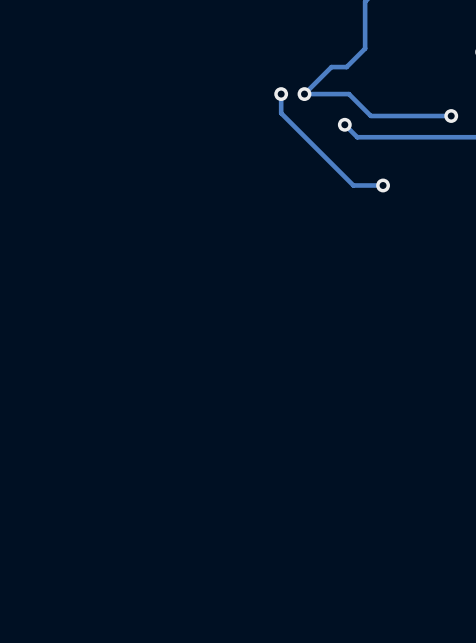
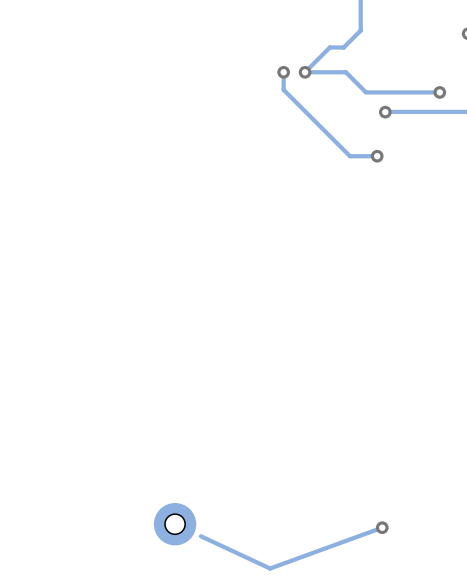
track: (344, 124) (357, 137) (392, 137) -> none
via position: (344, 124) -> (385, 112)
part: none -> (175, 524)
track: none -> (382, 527) (270, 568) (200, 536)
via: none -> (382, 527)

